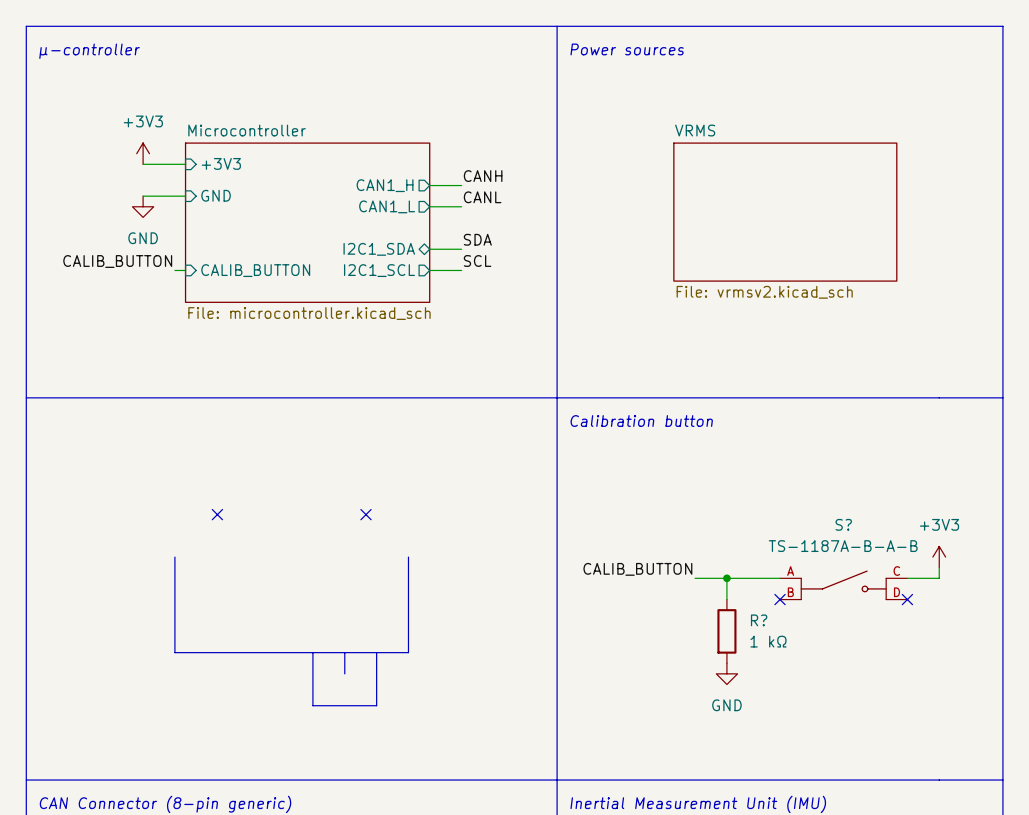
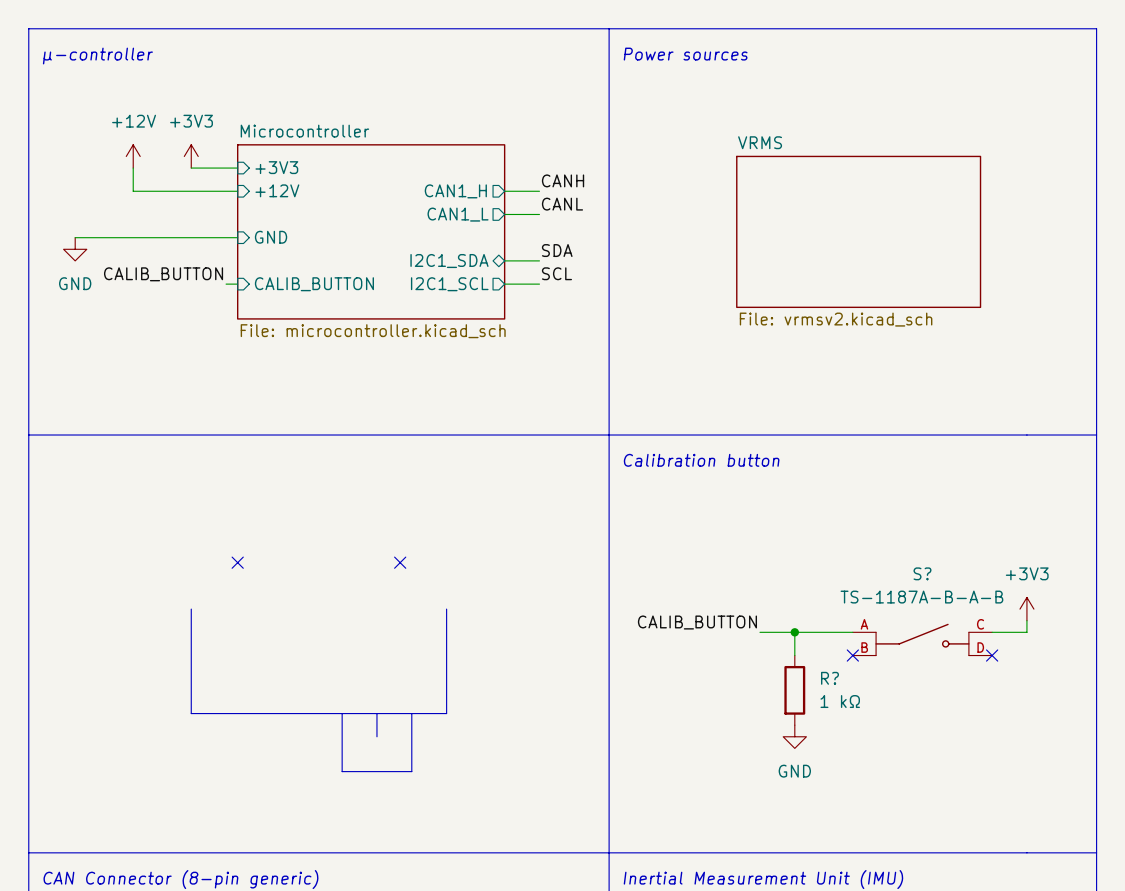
power symbol: none -> +12V (133, 156)
wire: none -> (133, 168) (133, 191) (237, 191)
power symbol position: +3V3 (143, 153) -> +3V3 (191, 156)
sheet pin position: +3V3 (221, 163) -> +3V3 (276, 167)
wire: (143, 164) (185, 164) -> (191, 168) (237, 168)
sheet pin: none -> +12V (277, 190)
label position: CANH (483, 176) -> CANH (563, 180)
sheet pin position: CAN1_H (385, 185) -> CAN1_H (455, 191)
wire: (429, 185) (461, 185) -> (504, 191) (539, 191)
sheet pin position: GND (216, 195) -> GND (271, 237)
wire: (143, 196) (185, 196) -> none
label position: CANL (482, 197) -> CANL (562, 204)
power symbol position: GND (143, 206) -> GND (75, 249)
sheet pin position: CAN1_L (387, 206) -> CAN1_L (458, 214)
wire: (429, 206) (461, 206) -> (504, 214) (539, 214)
wire: none -> (75, 237) (237, 237)
sheet Microcontroller position: (307, 222) -> (371, 231)
label position: SDA (477, 239) -> SDA (557, 250)
sheet pin position: I2C1_SDA (379, 249) -> I2C1_SDA (449, 261)
wire: (429, 249) (461, 249) -> (504, 260) (539, 260)
label position: CALIB_BUTTON (117, 261) -> CALIB_BUTTON (163, 274)
label position: SCL (477, 261) -> SCL (556, 273)
wire: (174, 270) (185, 270) -> (226, 284) (237, 284)
sheet pin position: CALIB_BUTTON (255, 270) -> CALIB_BUTTON (314, 284)
sheet pin position: I2C1_SCL (379, 270) -> I2C1_SCL (449, 284)
wire: (429, 270) (461, 270) -> (504, 284) (539, 284)

